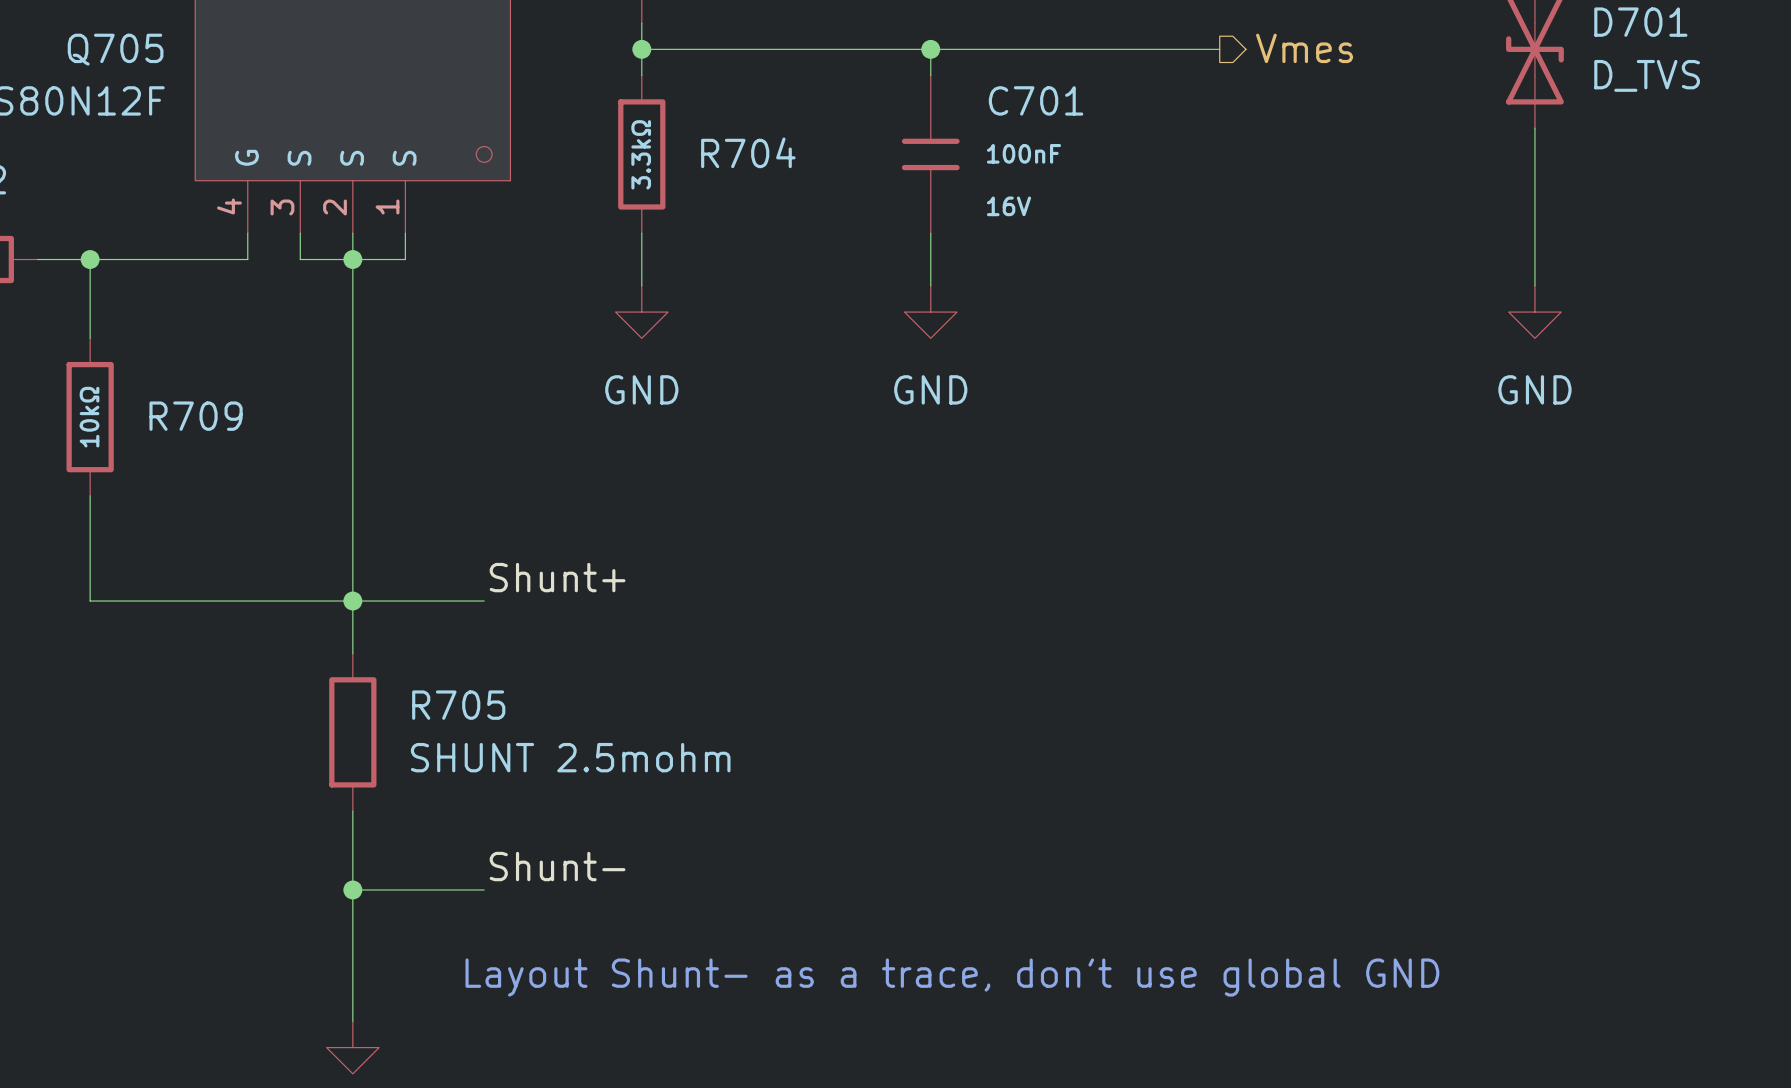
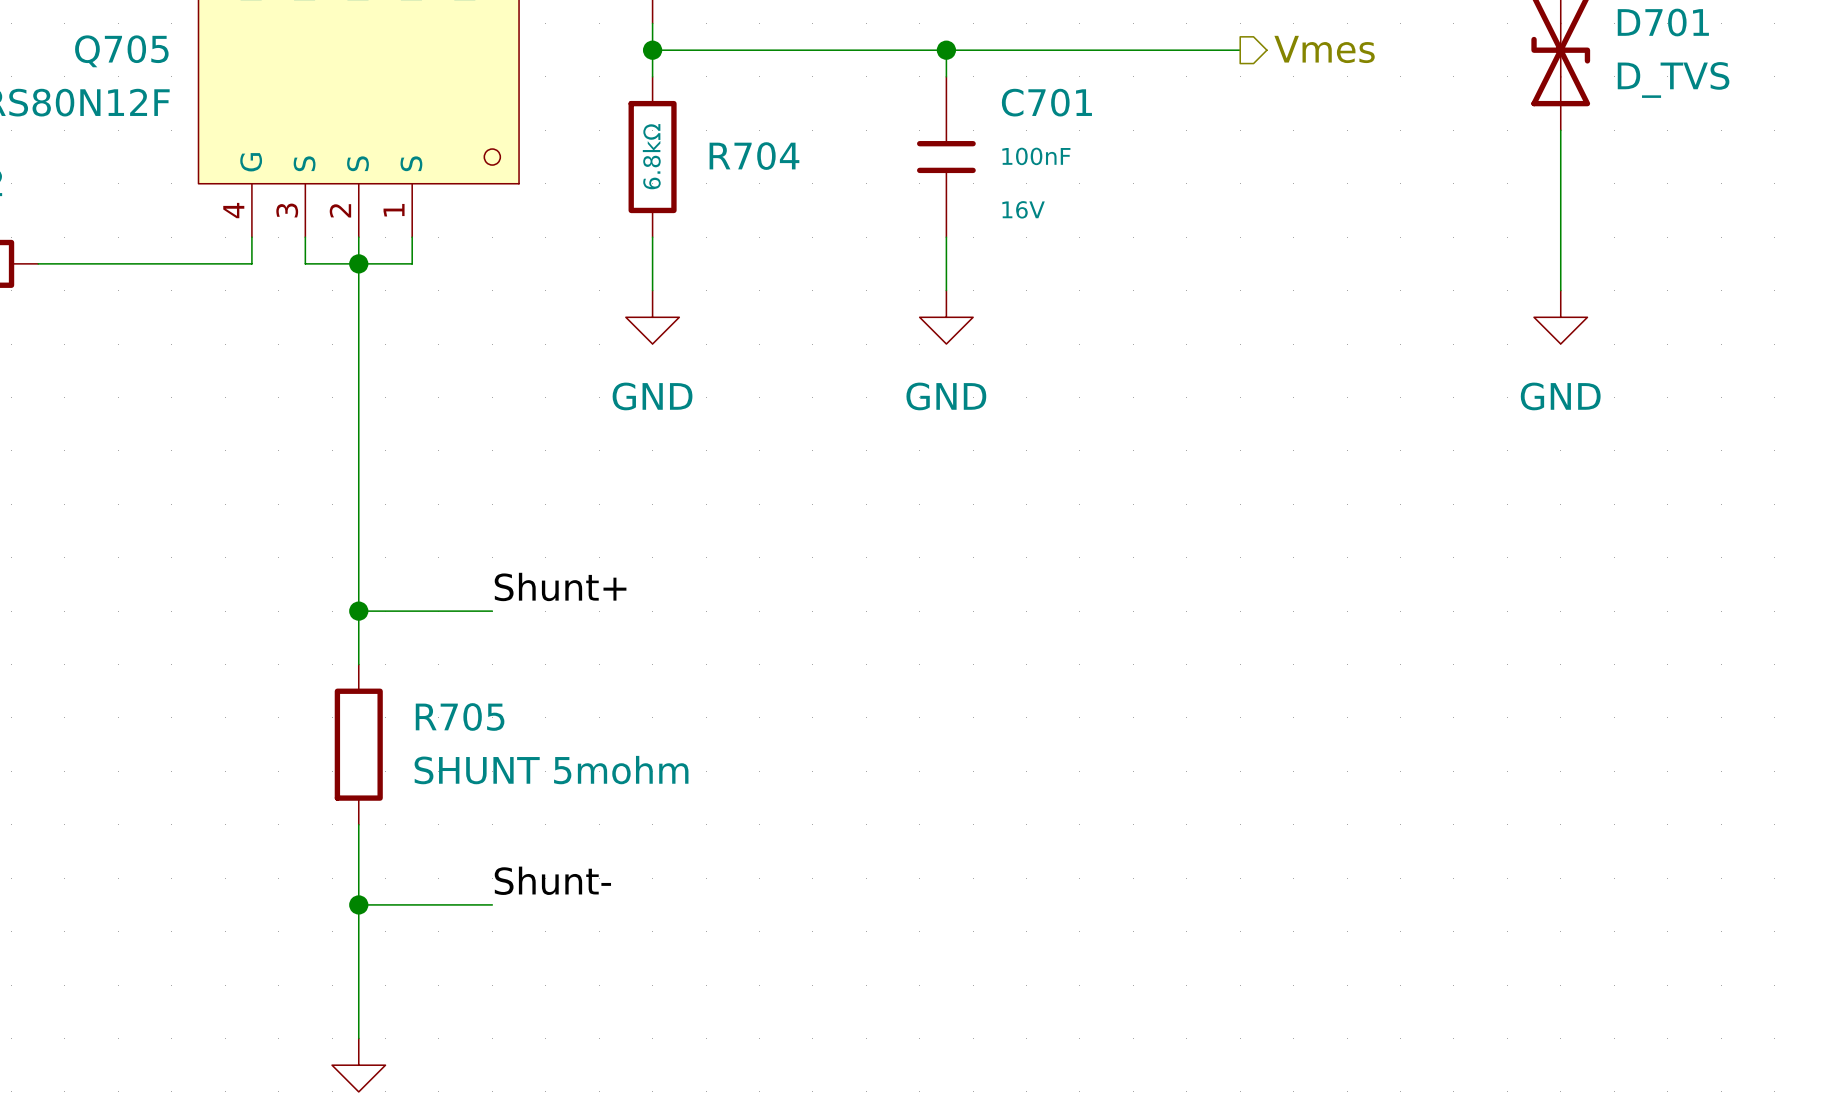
R704 value: 3.3kΩ (641, 154) -> 6.8kΩ (651, 156)
wire: (90, 259) (90, 338) -> none
junction: (90, 259) -> none
R709: 10kΩ (90, 417) -> none
wire: (90, 495) (90, 601) (352, 601) -> none
R705 value: SHUNT 2.5mohm (570, 757) -> SHUNT 5mohm (551, 770)
text: Layout Shunt- as a trace, don't use global GND (952, 977) -> none

